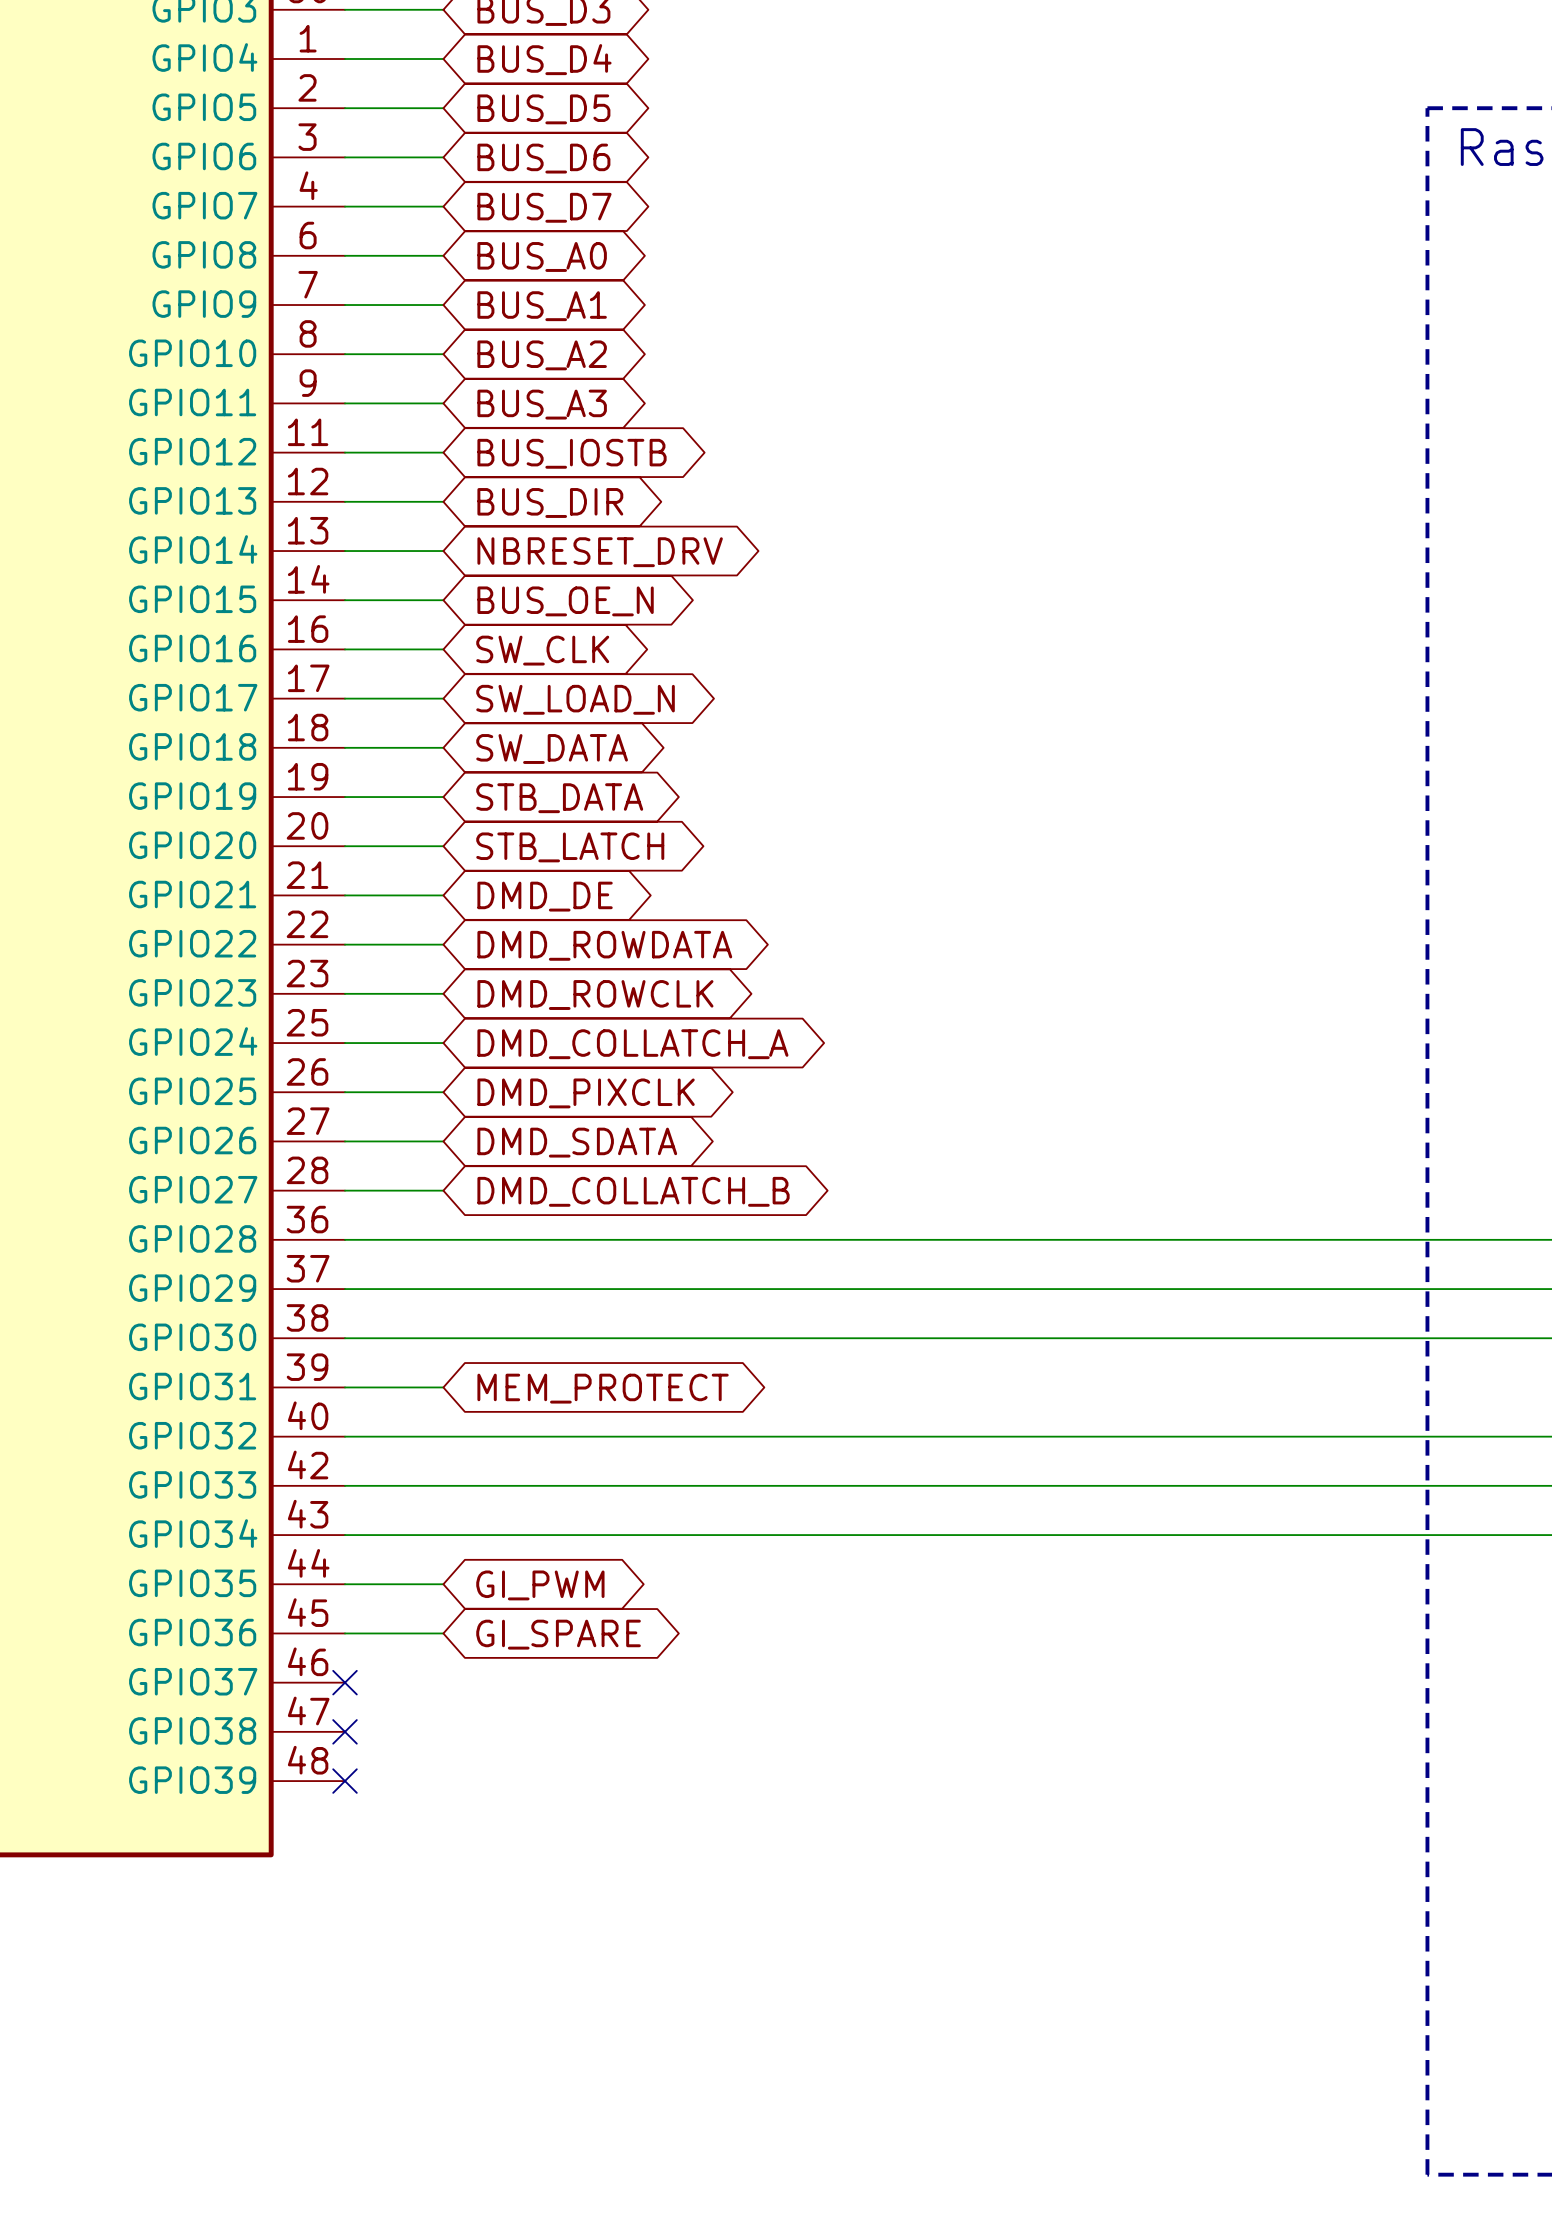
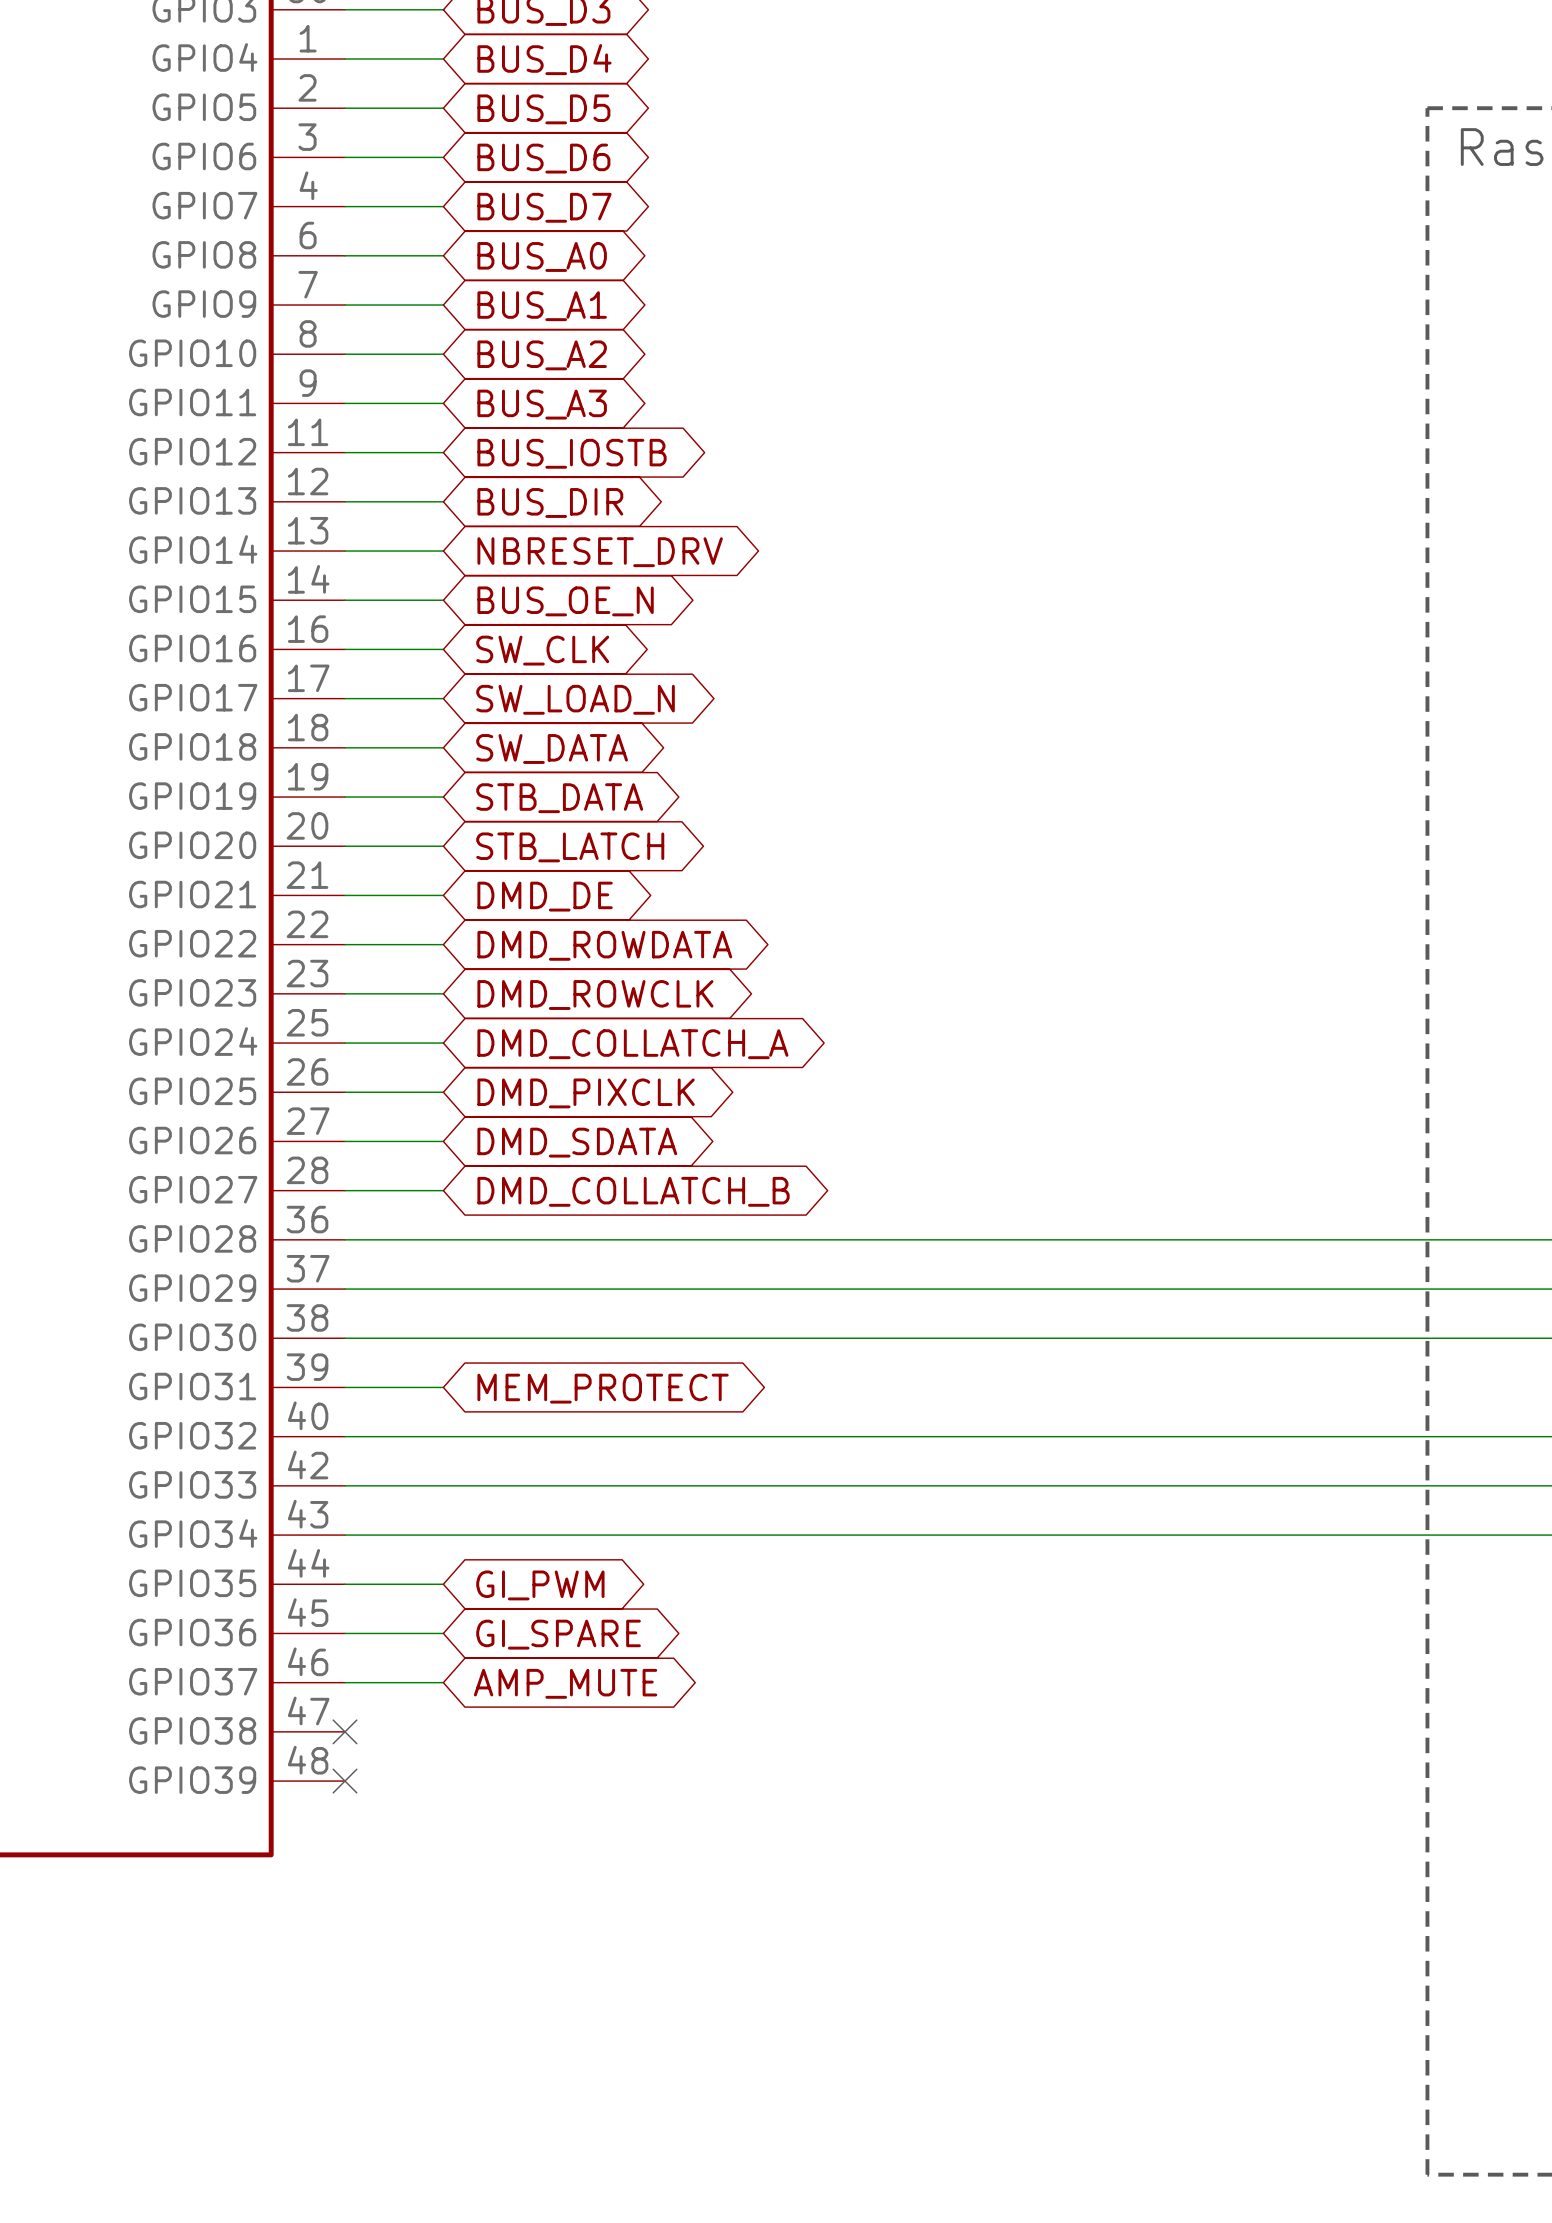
wire: none -> (345, 1682) (443, 1682)
no-connect mark: (345, 1682) -> none
global label: none -> AMP_MUTE (565, 1683)

